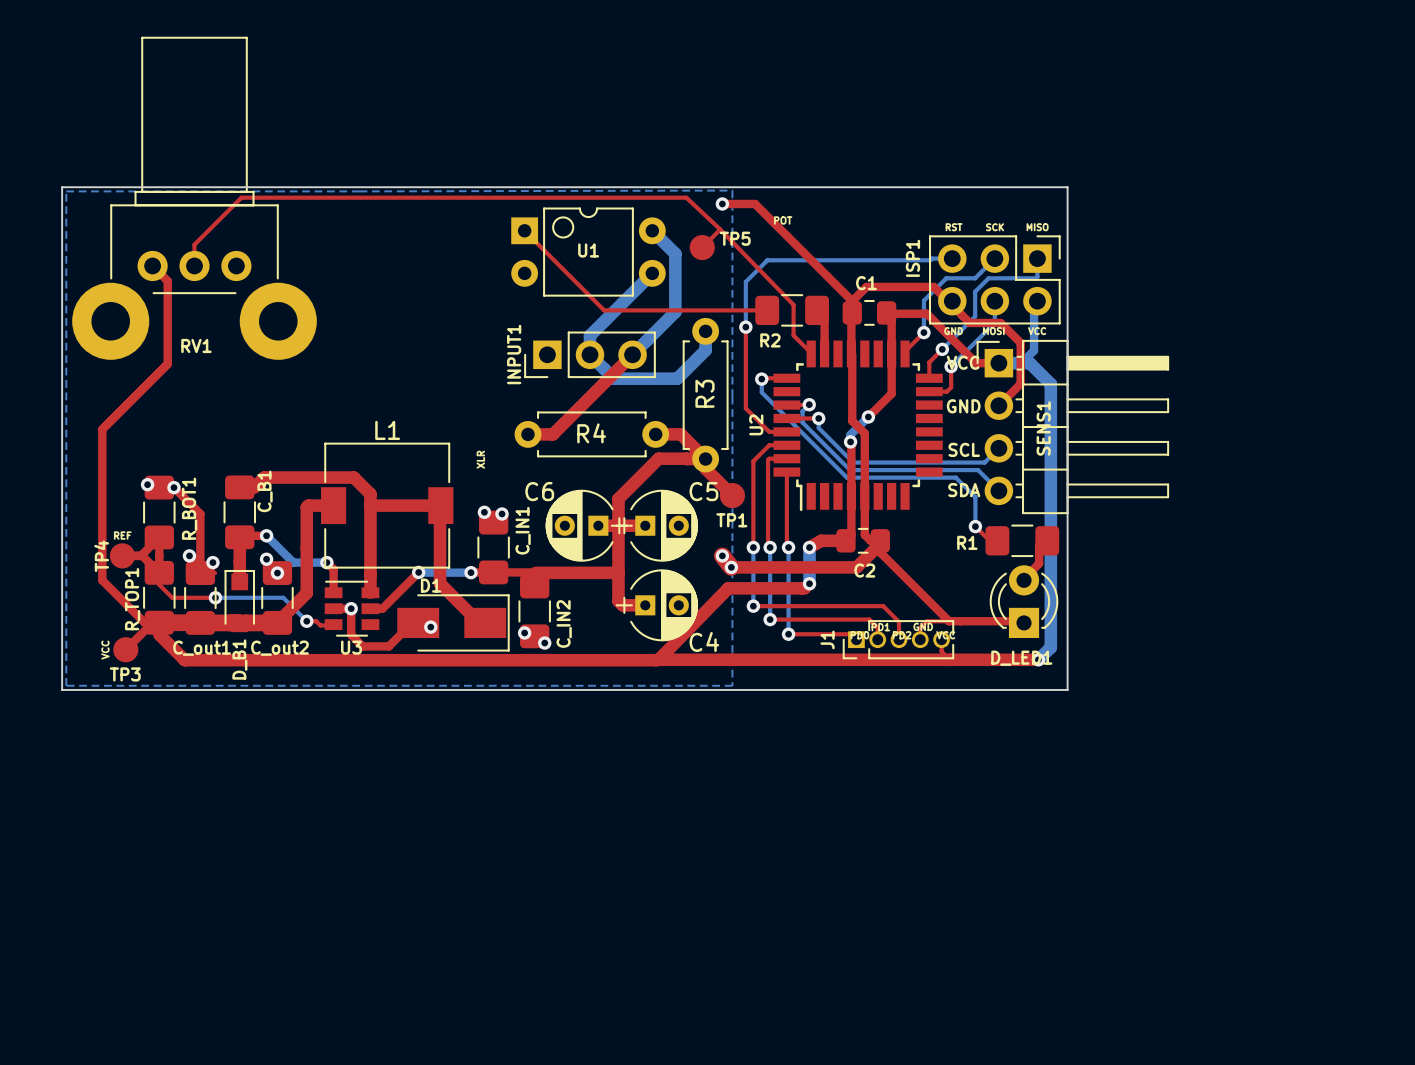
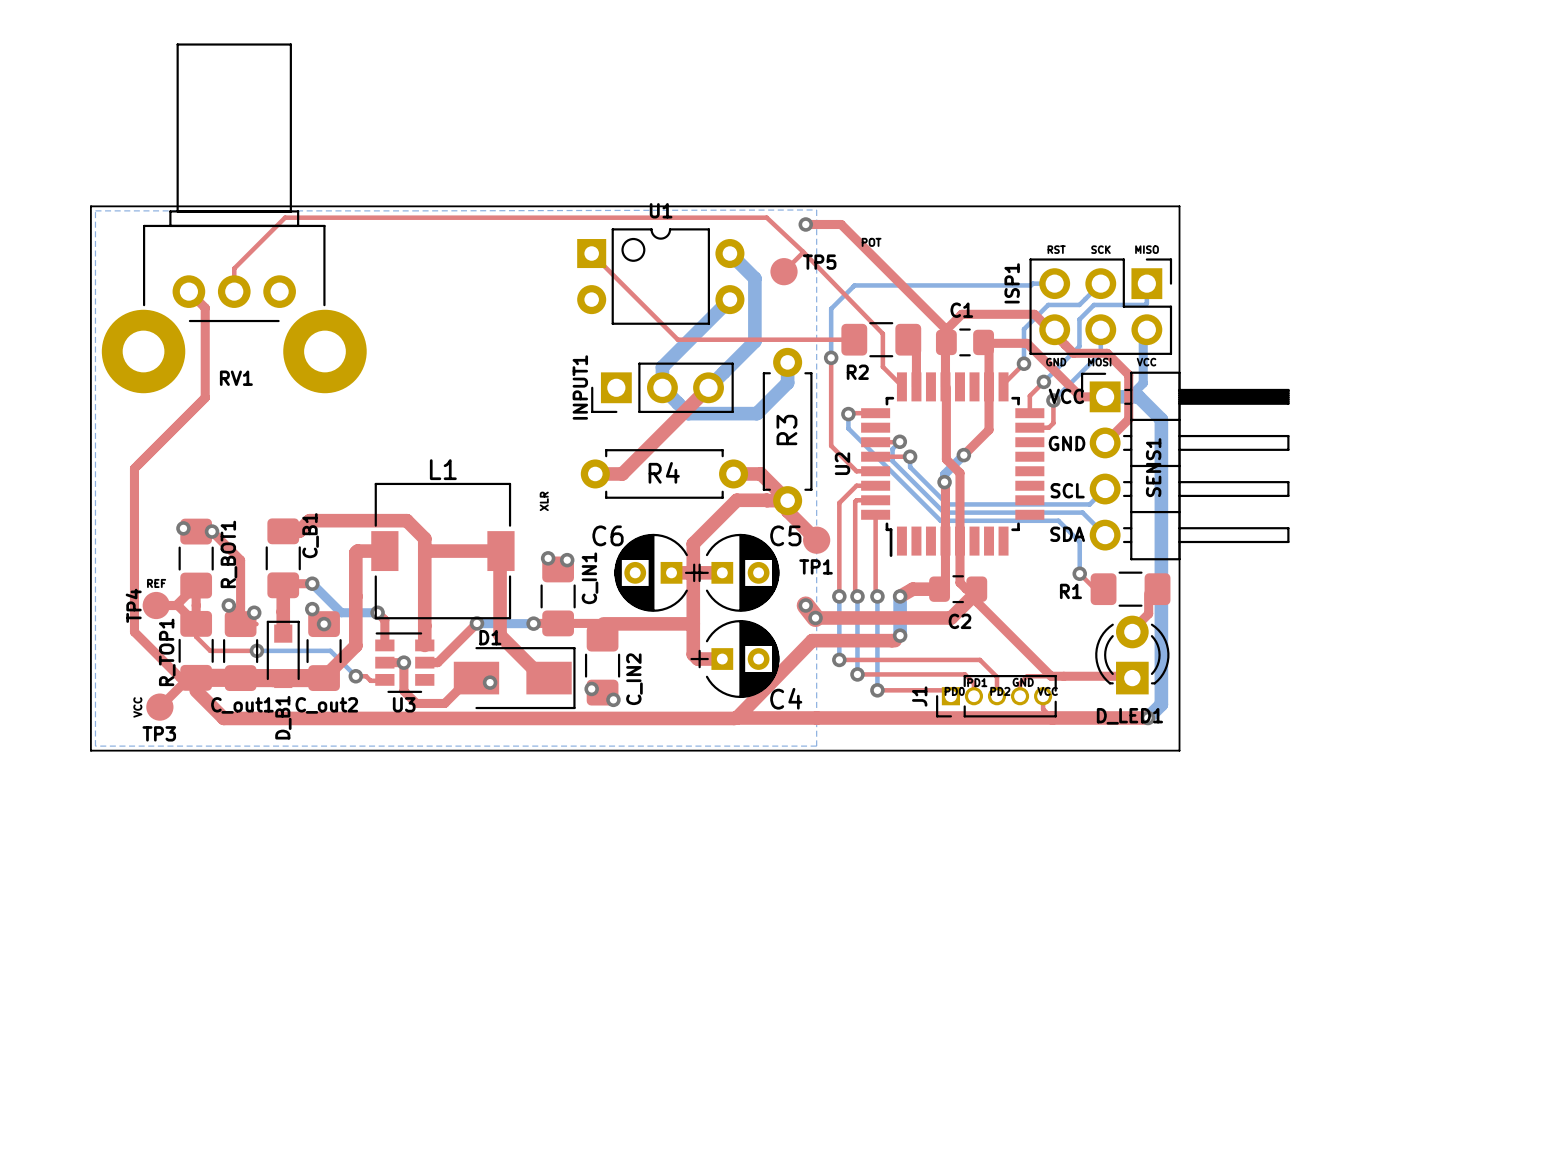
U1 name position: U1 (588, 250) -> U1 (661, 210)

